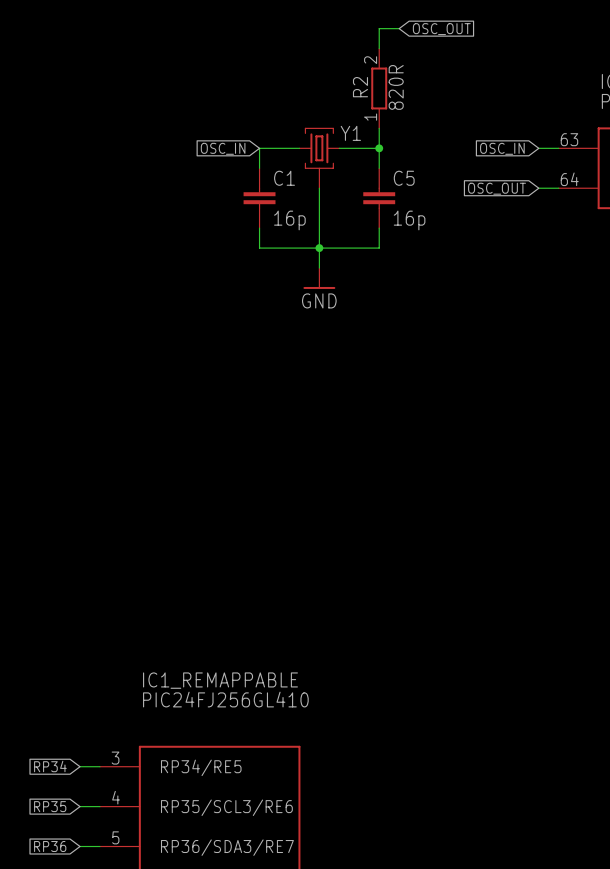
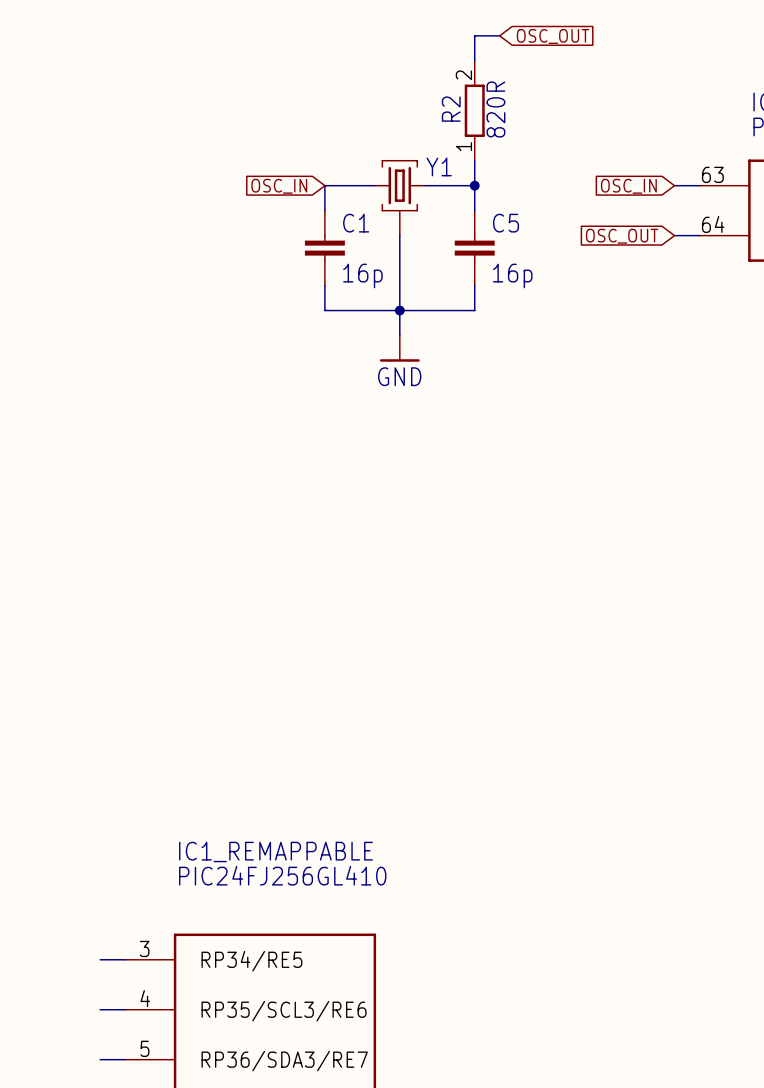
global label: RP34 (50, 766) -> none
global label: RP35 (50, 806) -> none
global label: RP36 (50, 846) -> none

